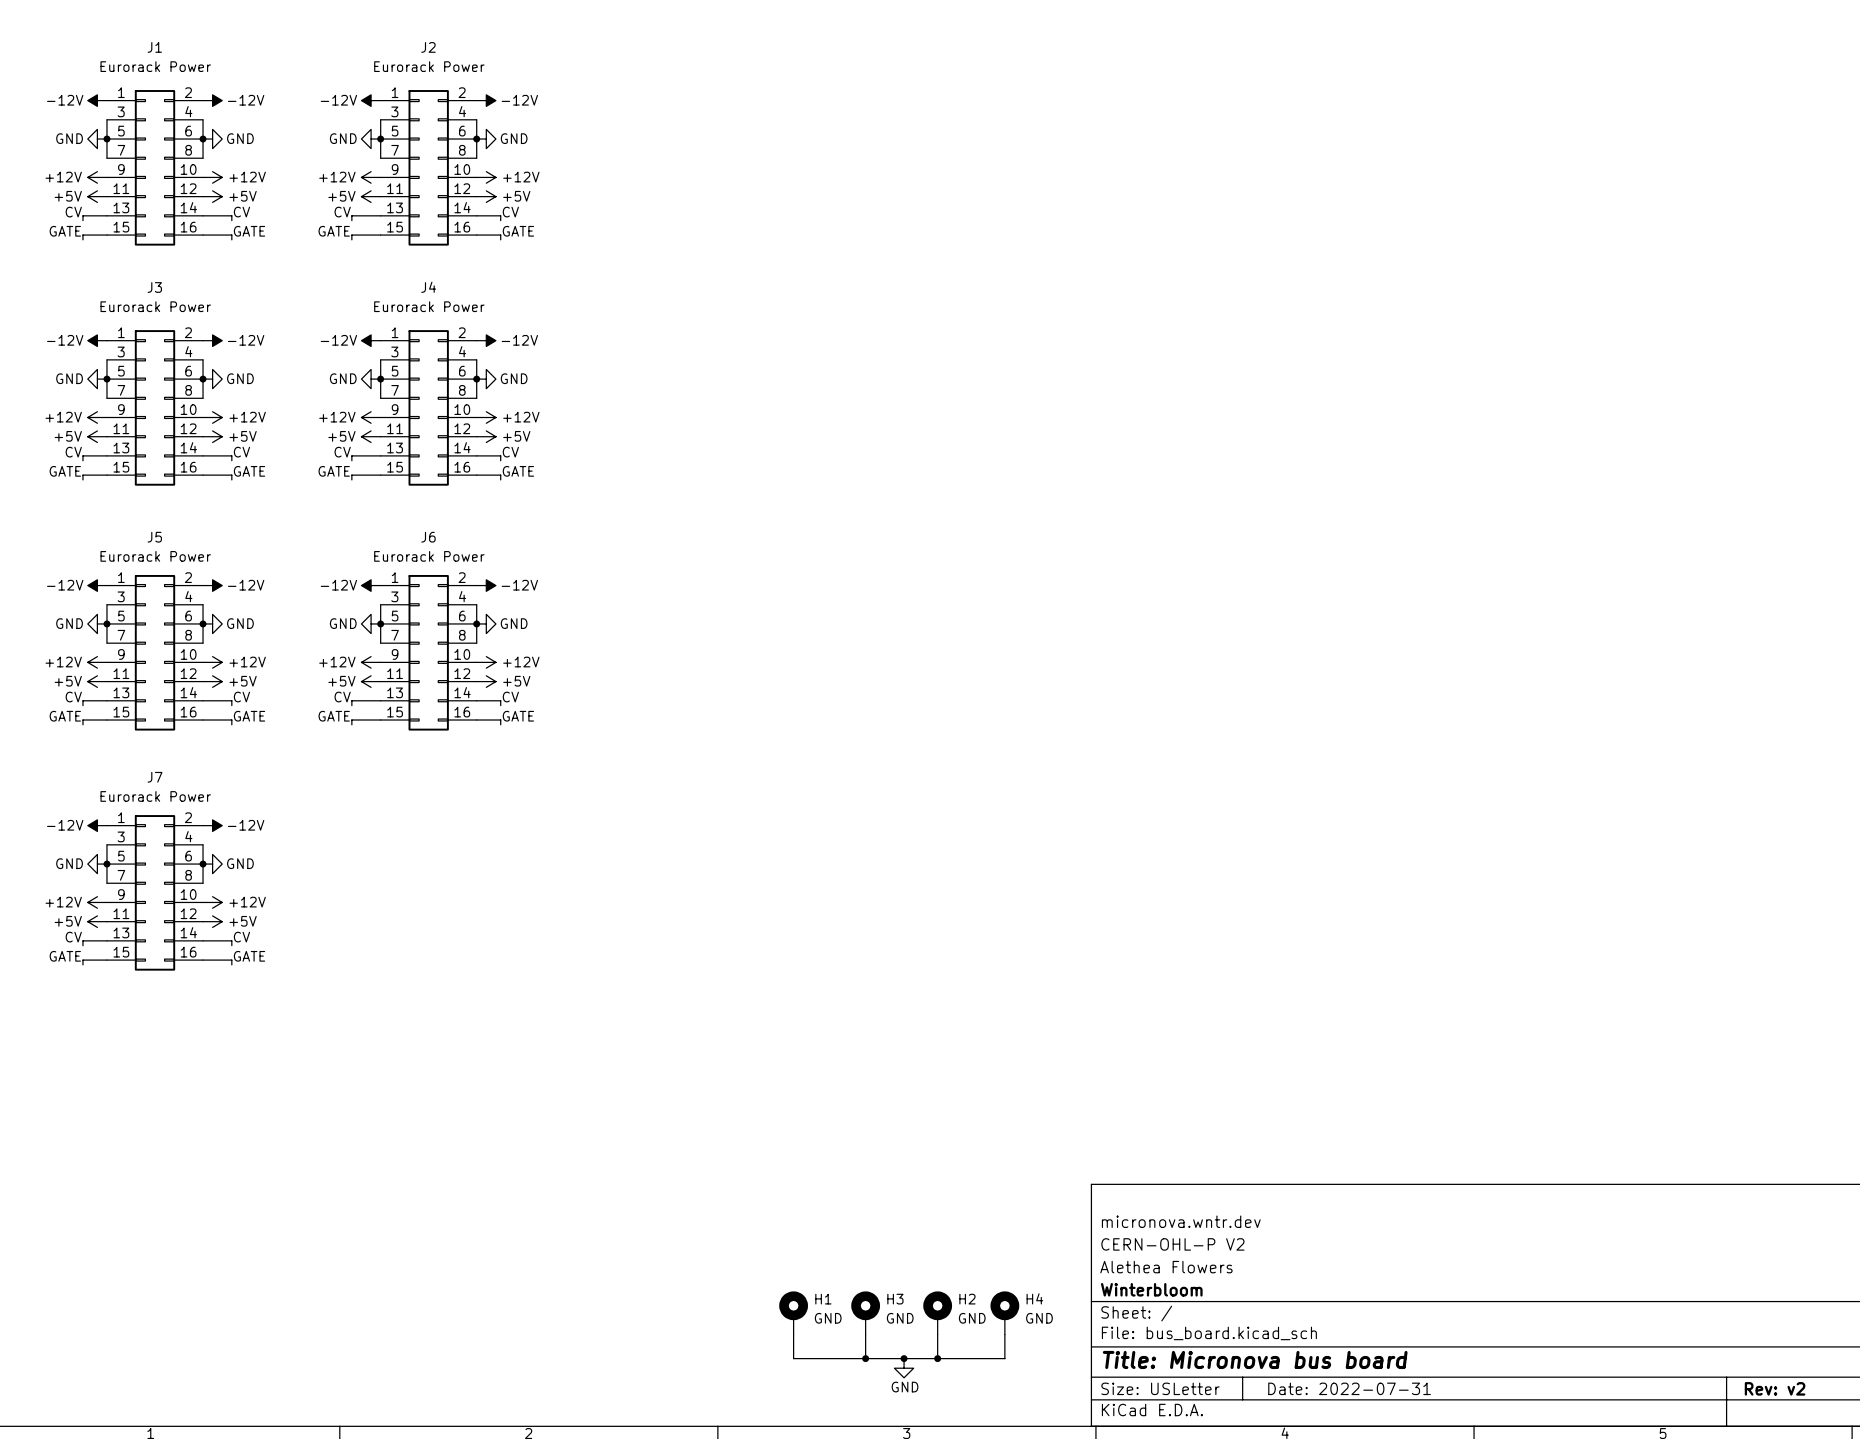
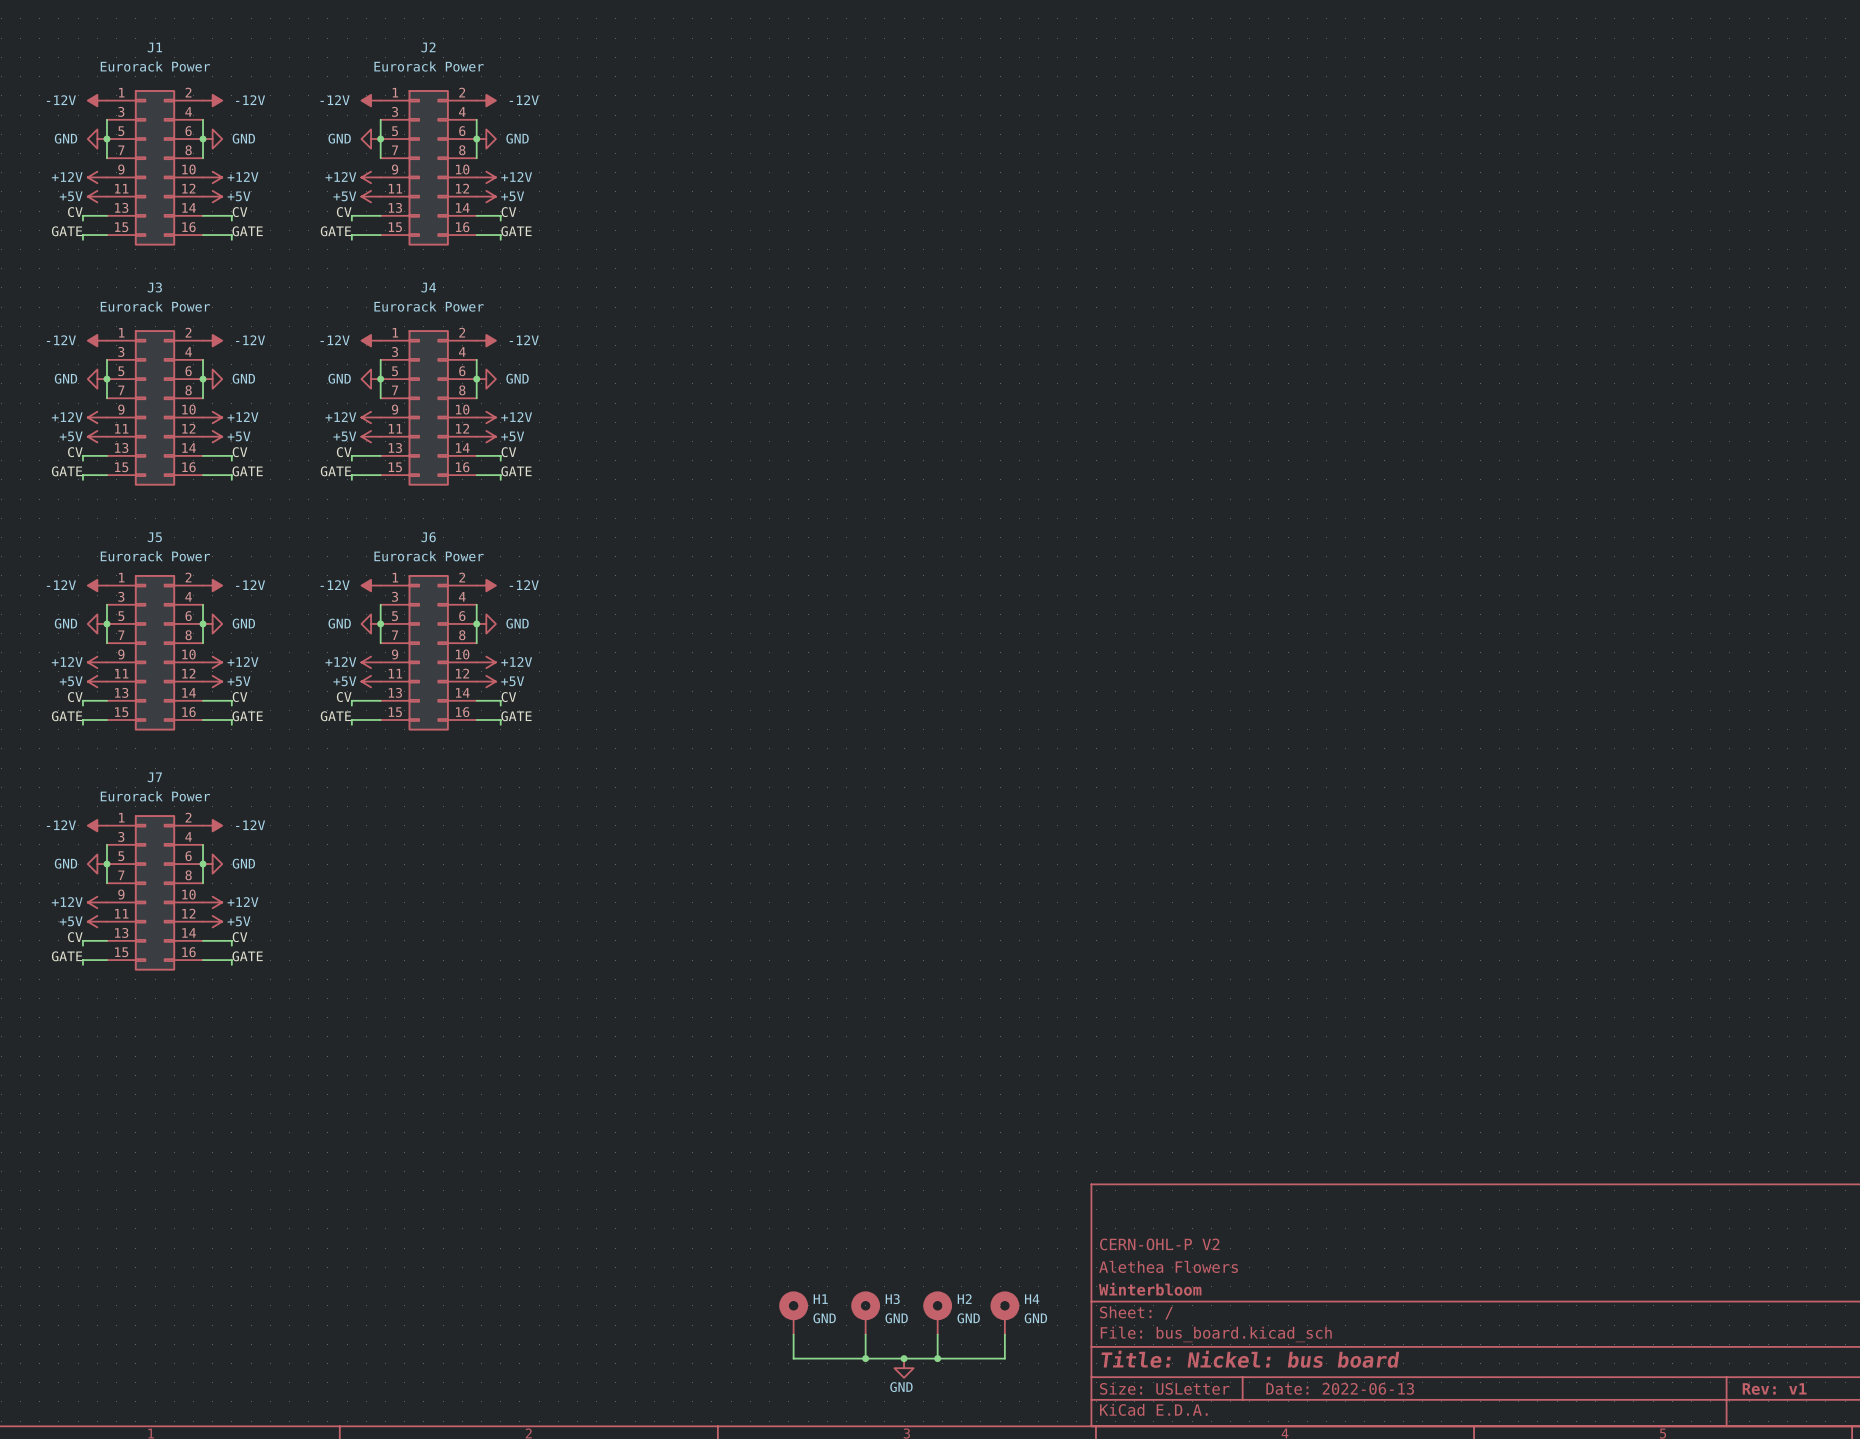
title block: micronova.wntr.dev (1181, 1221) -> none
title block: Title: Micronova bus board (1255, 1359) -> Title: Nickel: bus board (1250, 1359)
title block: Date: 2022-07-31 (1349, 1388) -> Date: 2022-06-13 (1340, 1388)
title block: Rev: v2 (1775, 1388) -> Rev: v1 (1774, 1388)

